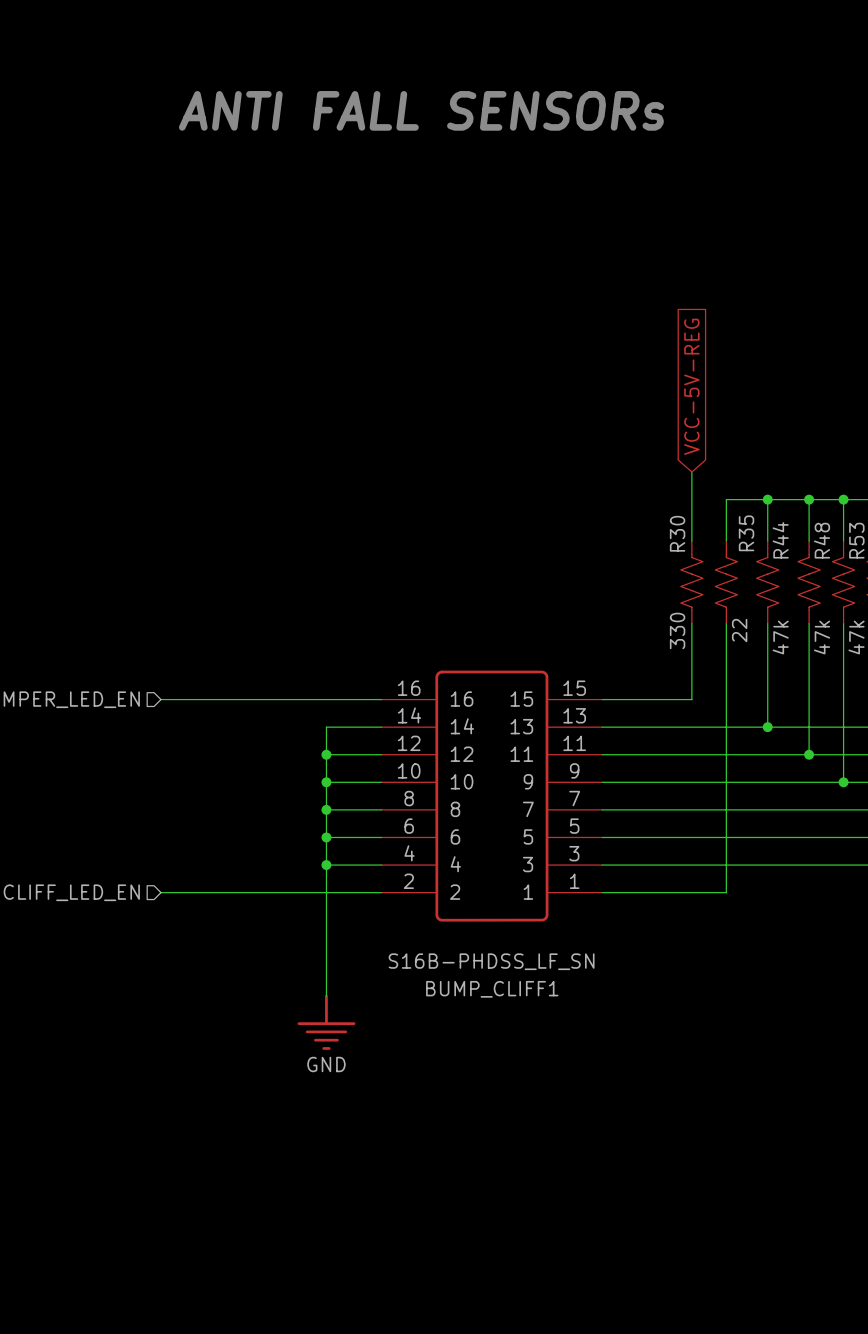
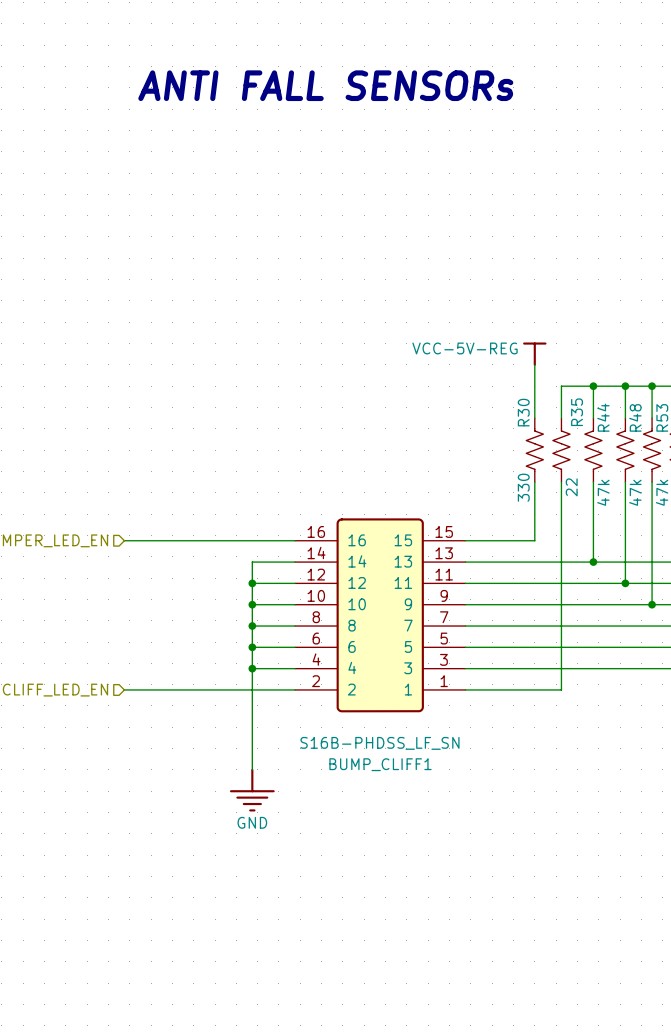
global label: VCC-5V-REG (691, 386) -> none
power symbol: none -> VCC-5V-REG (534, 354)

